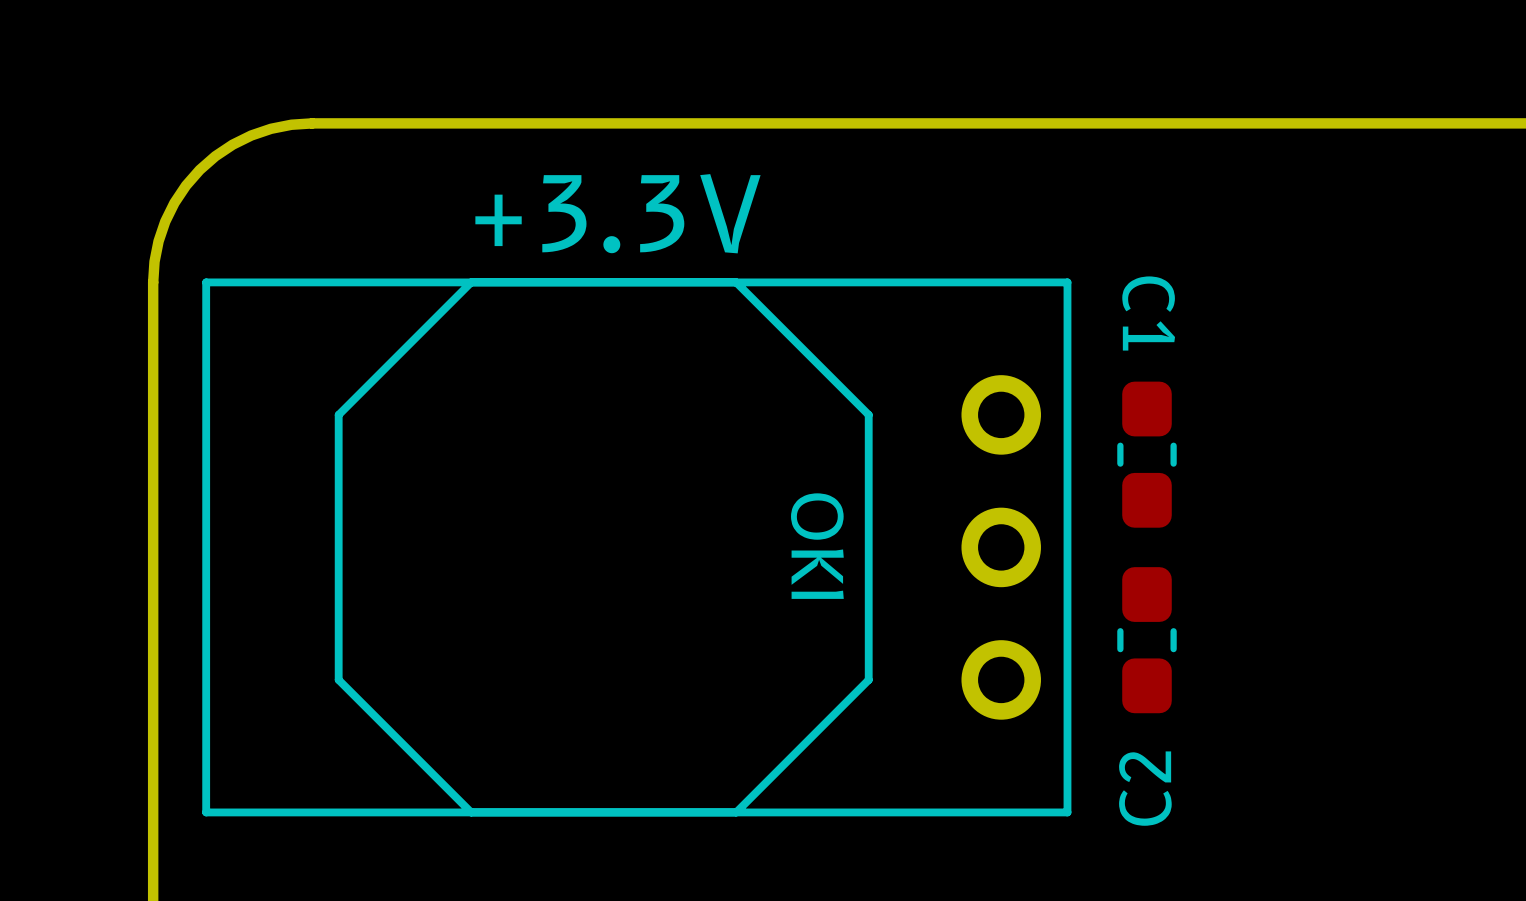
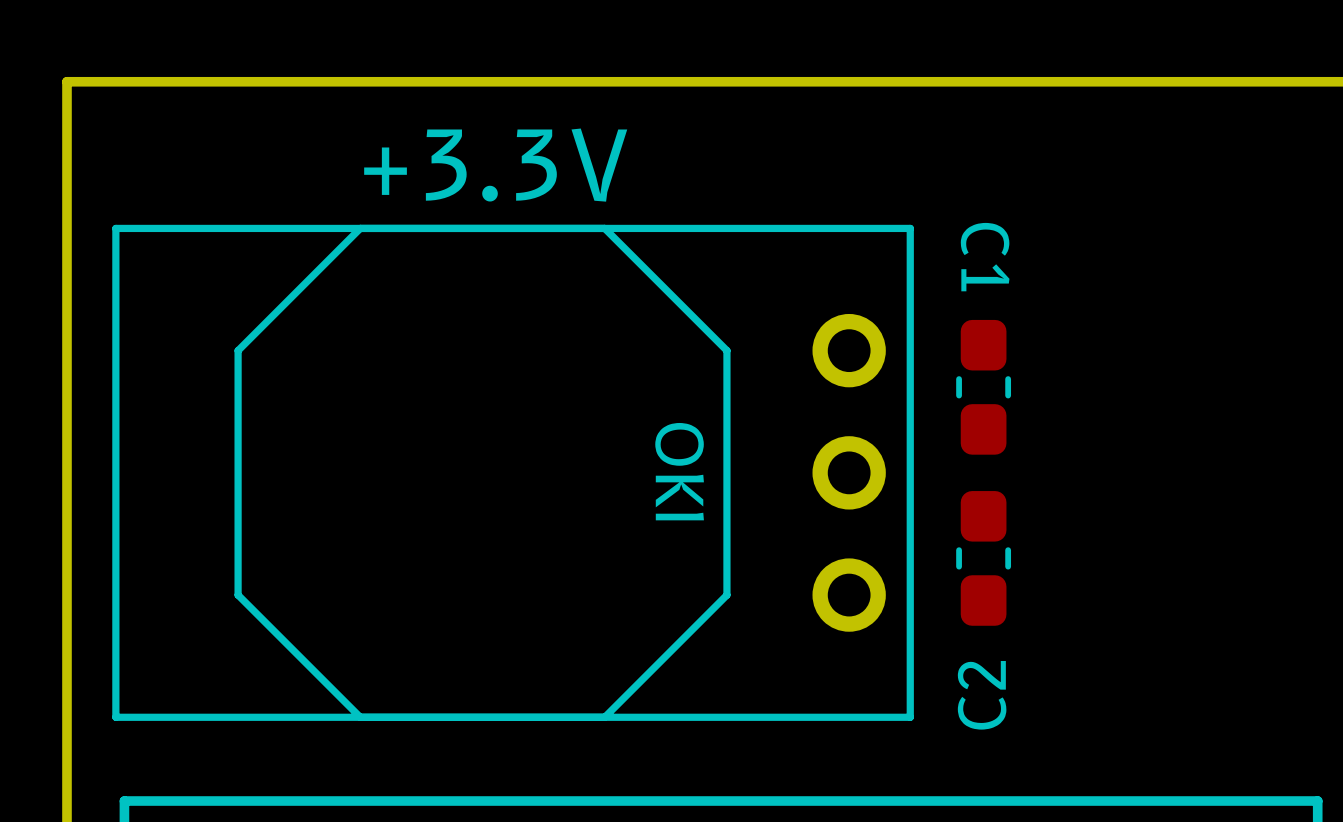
board edge: (312, 123) (271, 128) (251, 135) (215, 156) (199, 169) (174, 202) (165, 221) (158, 241) (153, 282) -> (213, 81) (66, 81) (66, 228)

